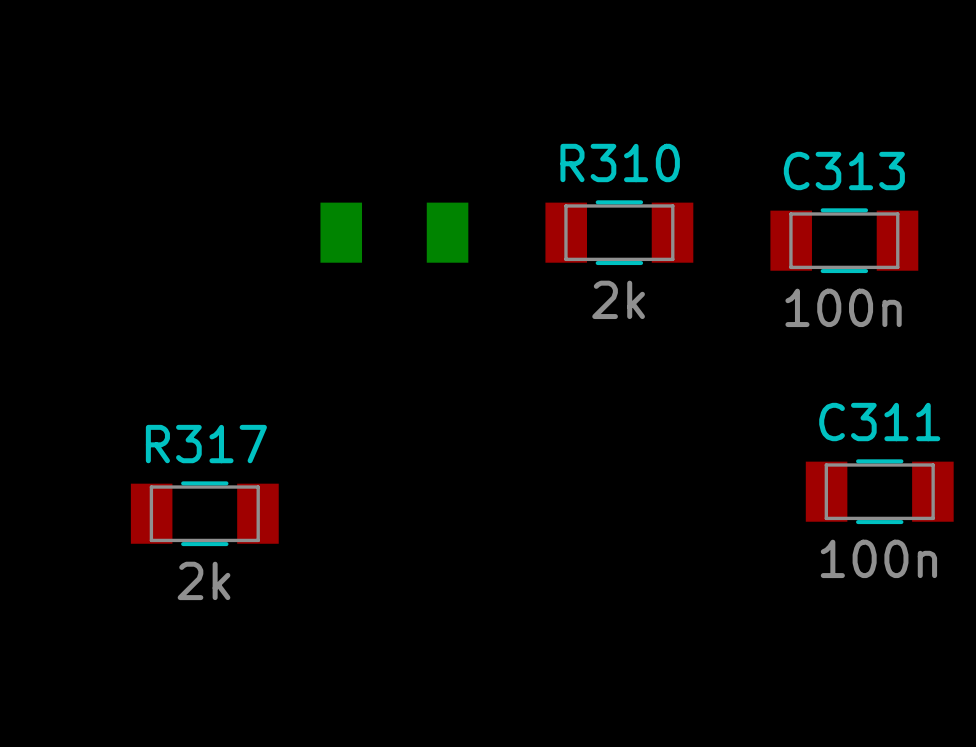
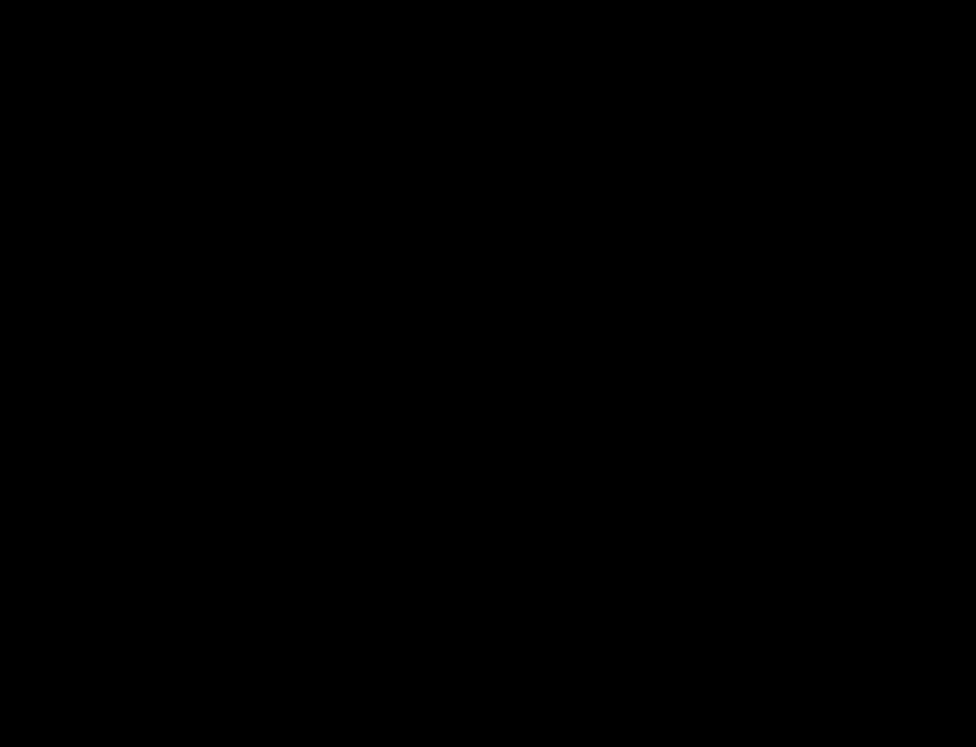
part: (394, 232) -> none
R310: 2k (619, 232) -> none
C313: 100n (844, 240) -> none
C311: 100n (879, 491) -> none
R317: 2k (204, 513) -> none

